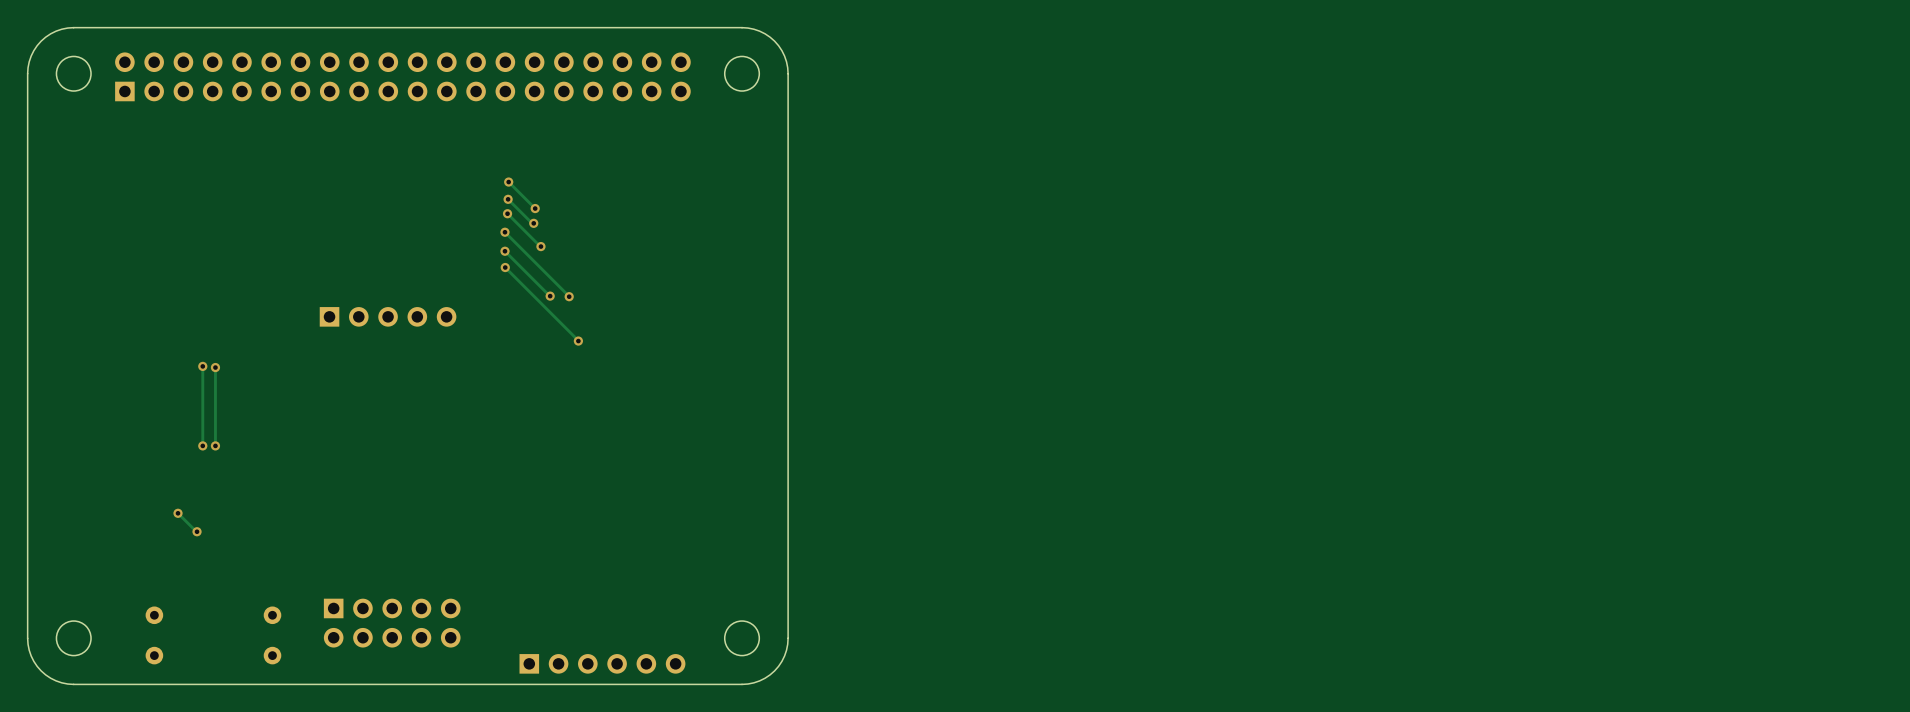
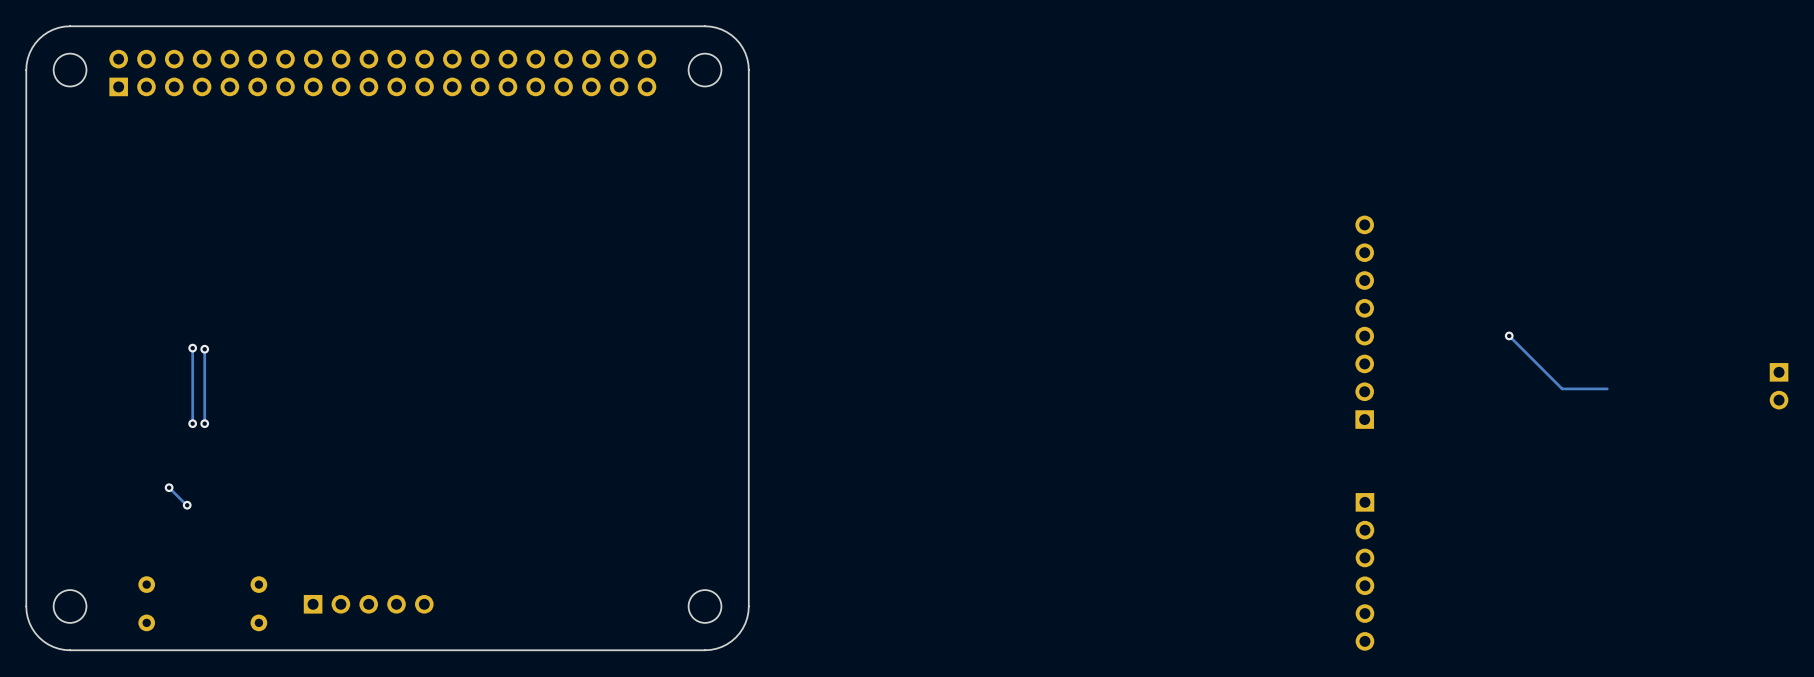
track: (508, 182) (535, 208) -> none
via: (508, 182) -> none
track: (508, 199) (533, 223) -> none
via: (508, 199) -> none
via: (535, 208) -> none
track: (507, 213) (540, 246) -> none
via: (507, 213) -> none
via: (533, 223) -> none
track: (504, 232) (569, 296) -> none
via: (504, 232) -> none
via: (540, 246) -> none
via: (504, 251) -> none
track: (508, 251) (504, 251) (550, 296) -> none
track: (505, 267) (578, 341) -> none
via: (505, 267) -> none
via: (550, 296) -> none
via: (569, 296) -> none
part: (388, 316) -> none
part: none -> (1364, 322)
via: (578, 341) -> none
track: none -> (1509, 335) (1562, 388) (1607, 388)
via: none -> (1509, 335)
part: none -> (1779, 386)
part: none -> (1364, 571)
part: (392, 623) -> none
part: none -> (368, 604)
part: (602, 663) -> none

